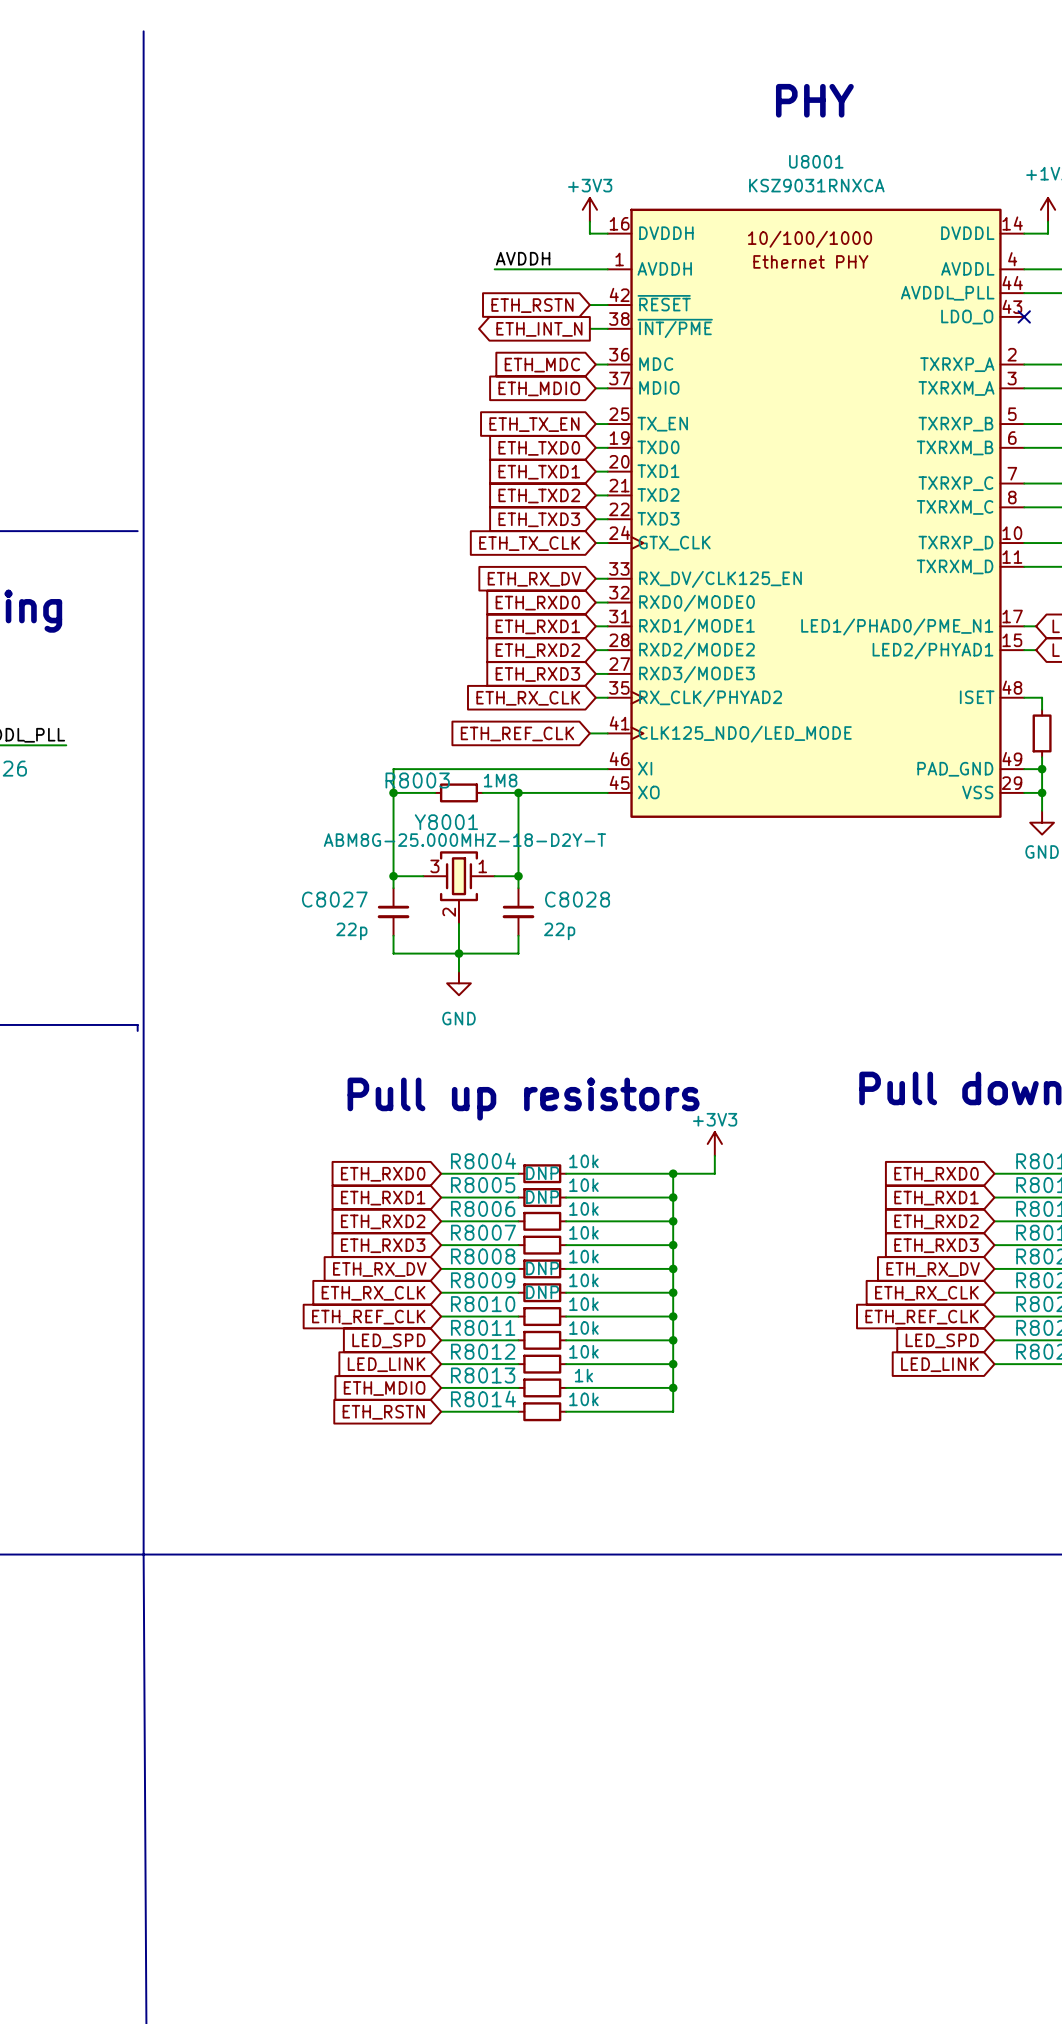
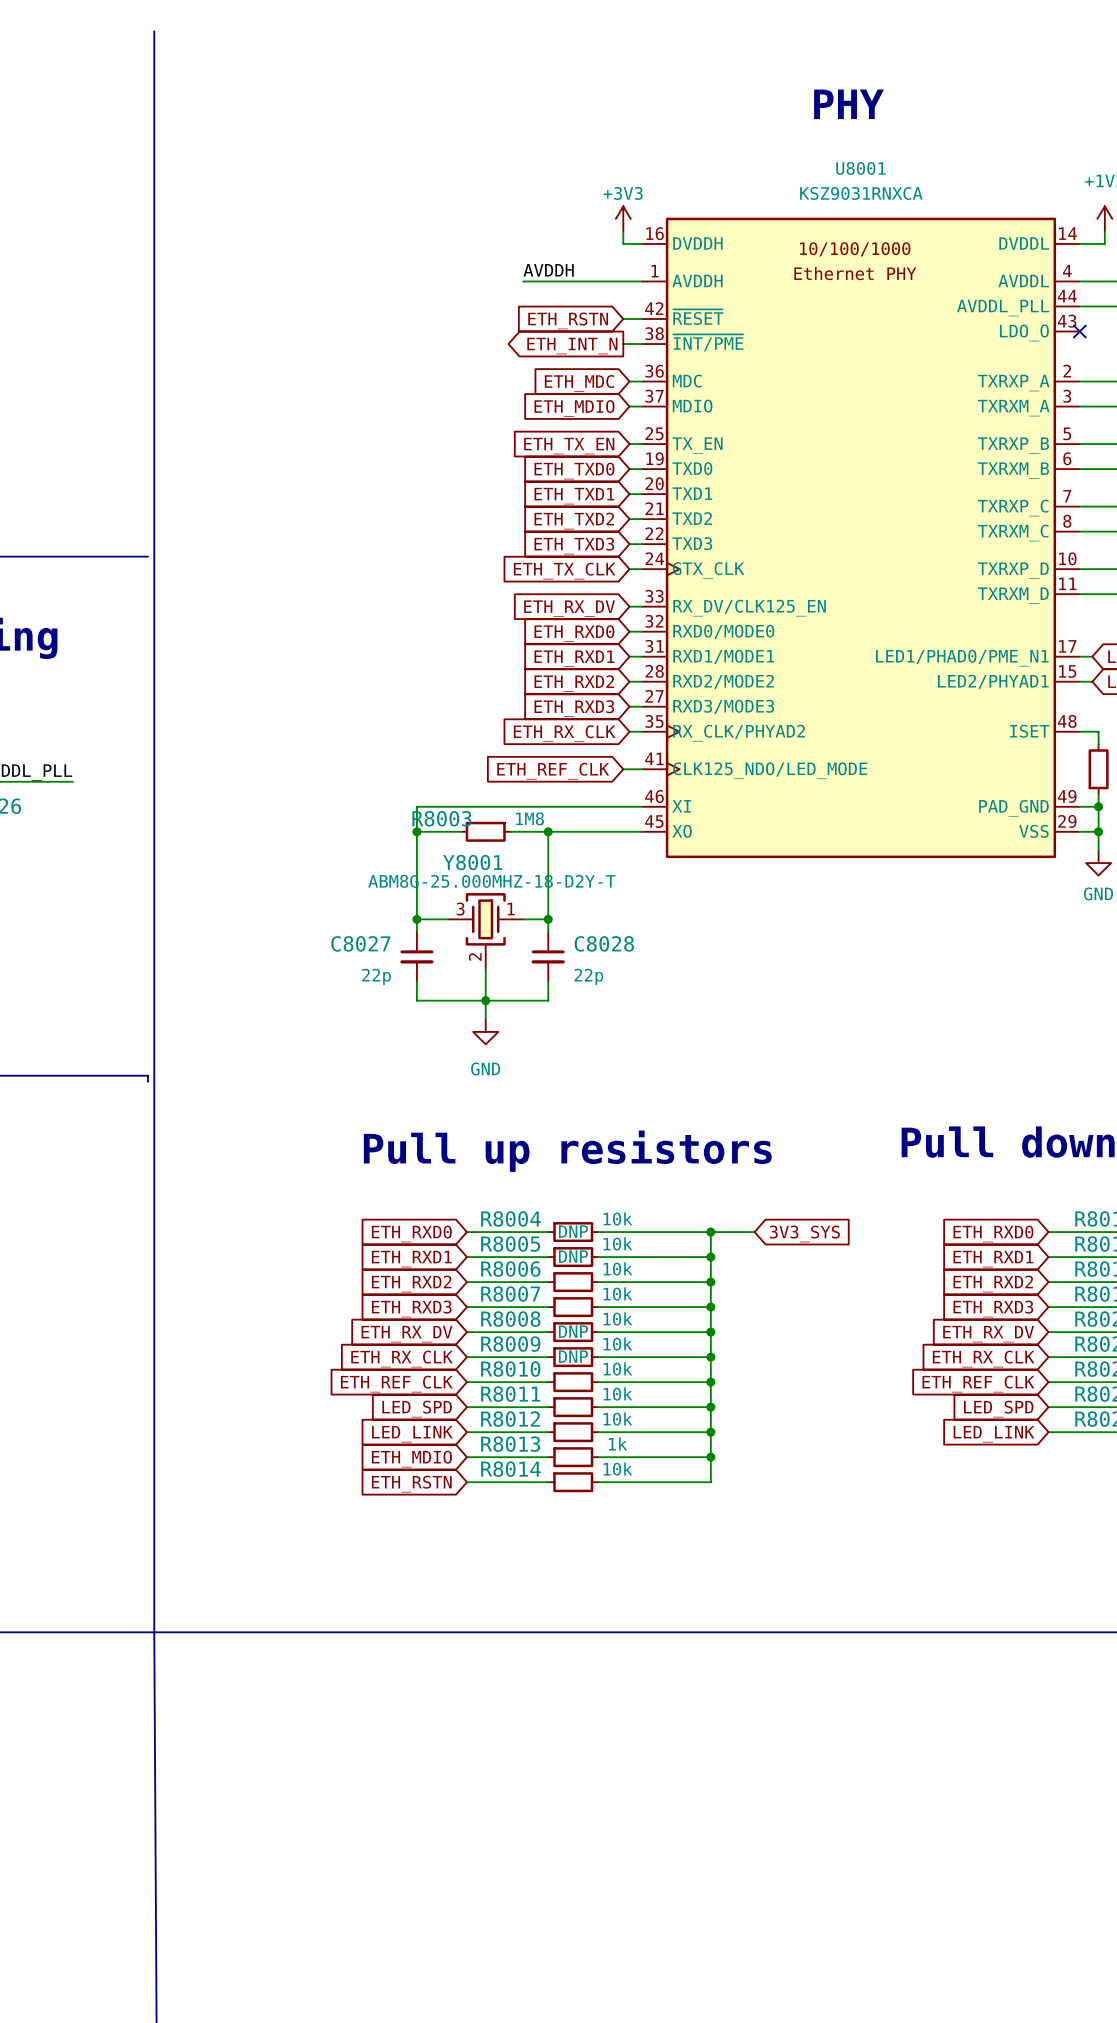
power symbol: +3V3 (714, 1143) -> none
wire: (714, 1155) (714, 1173) -> none
global label: none -> 3V3_SYS (804, 1233)

